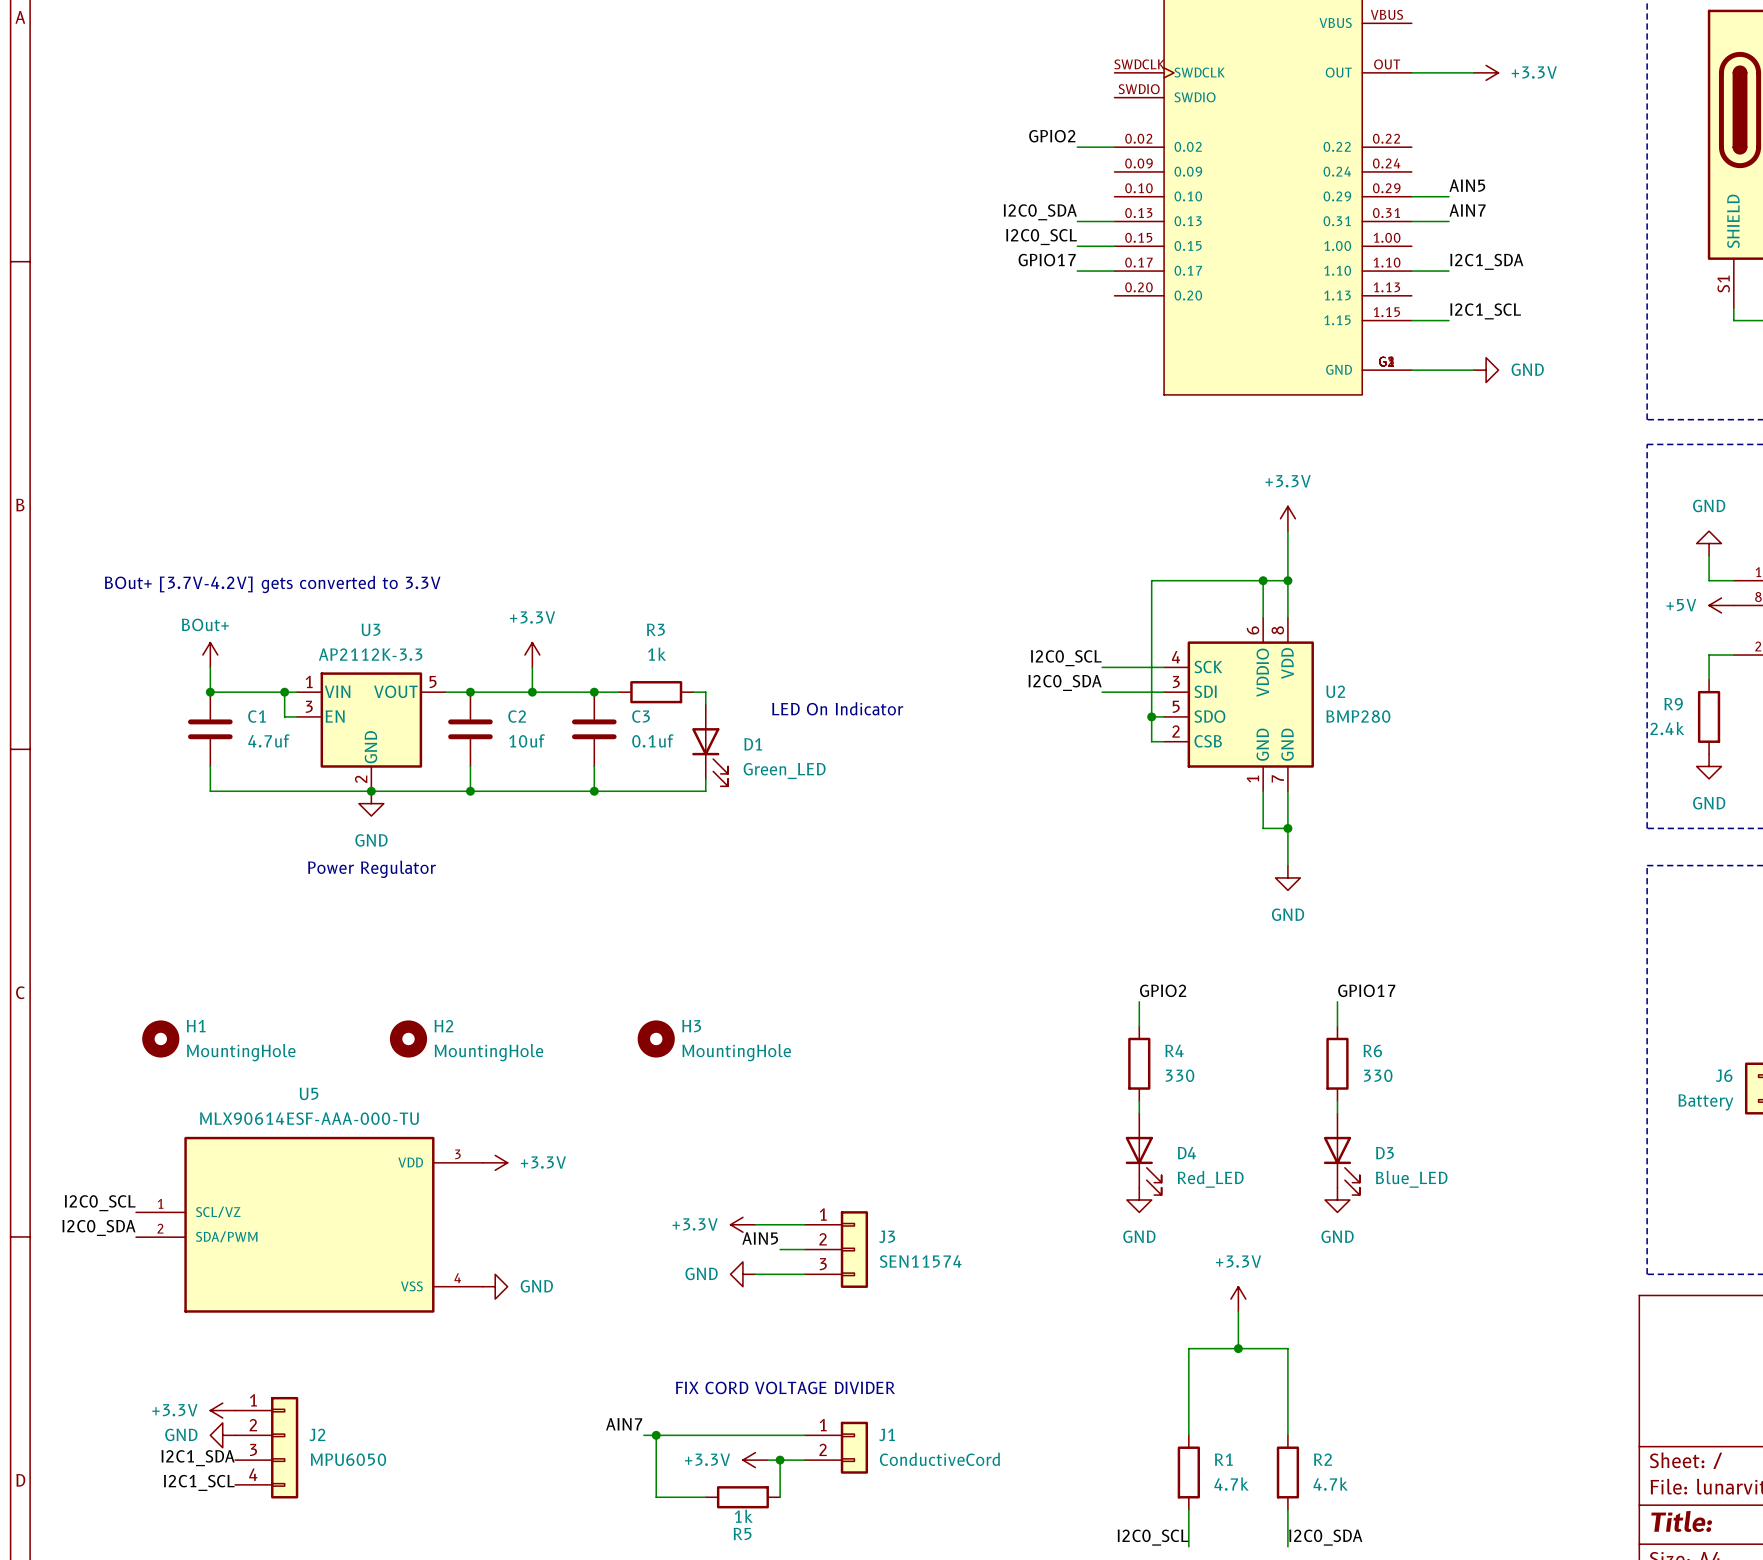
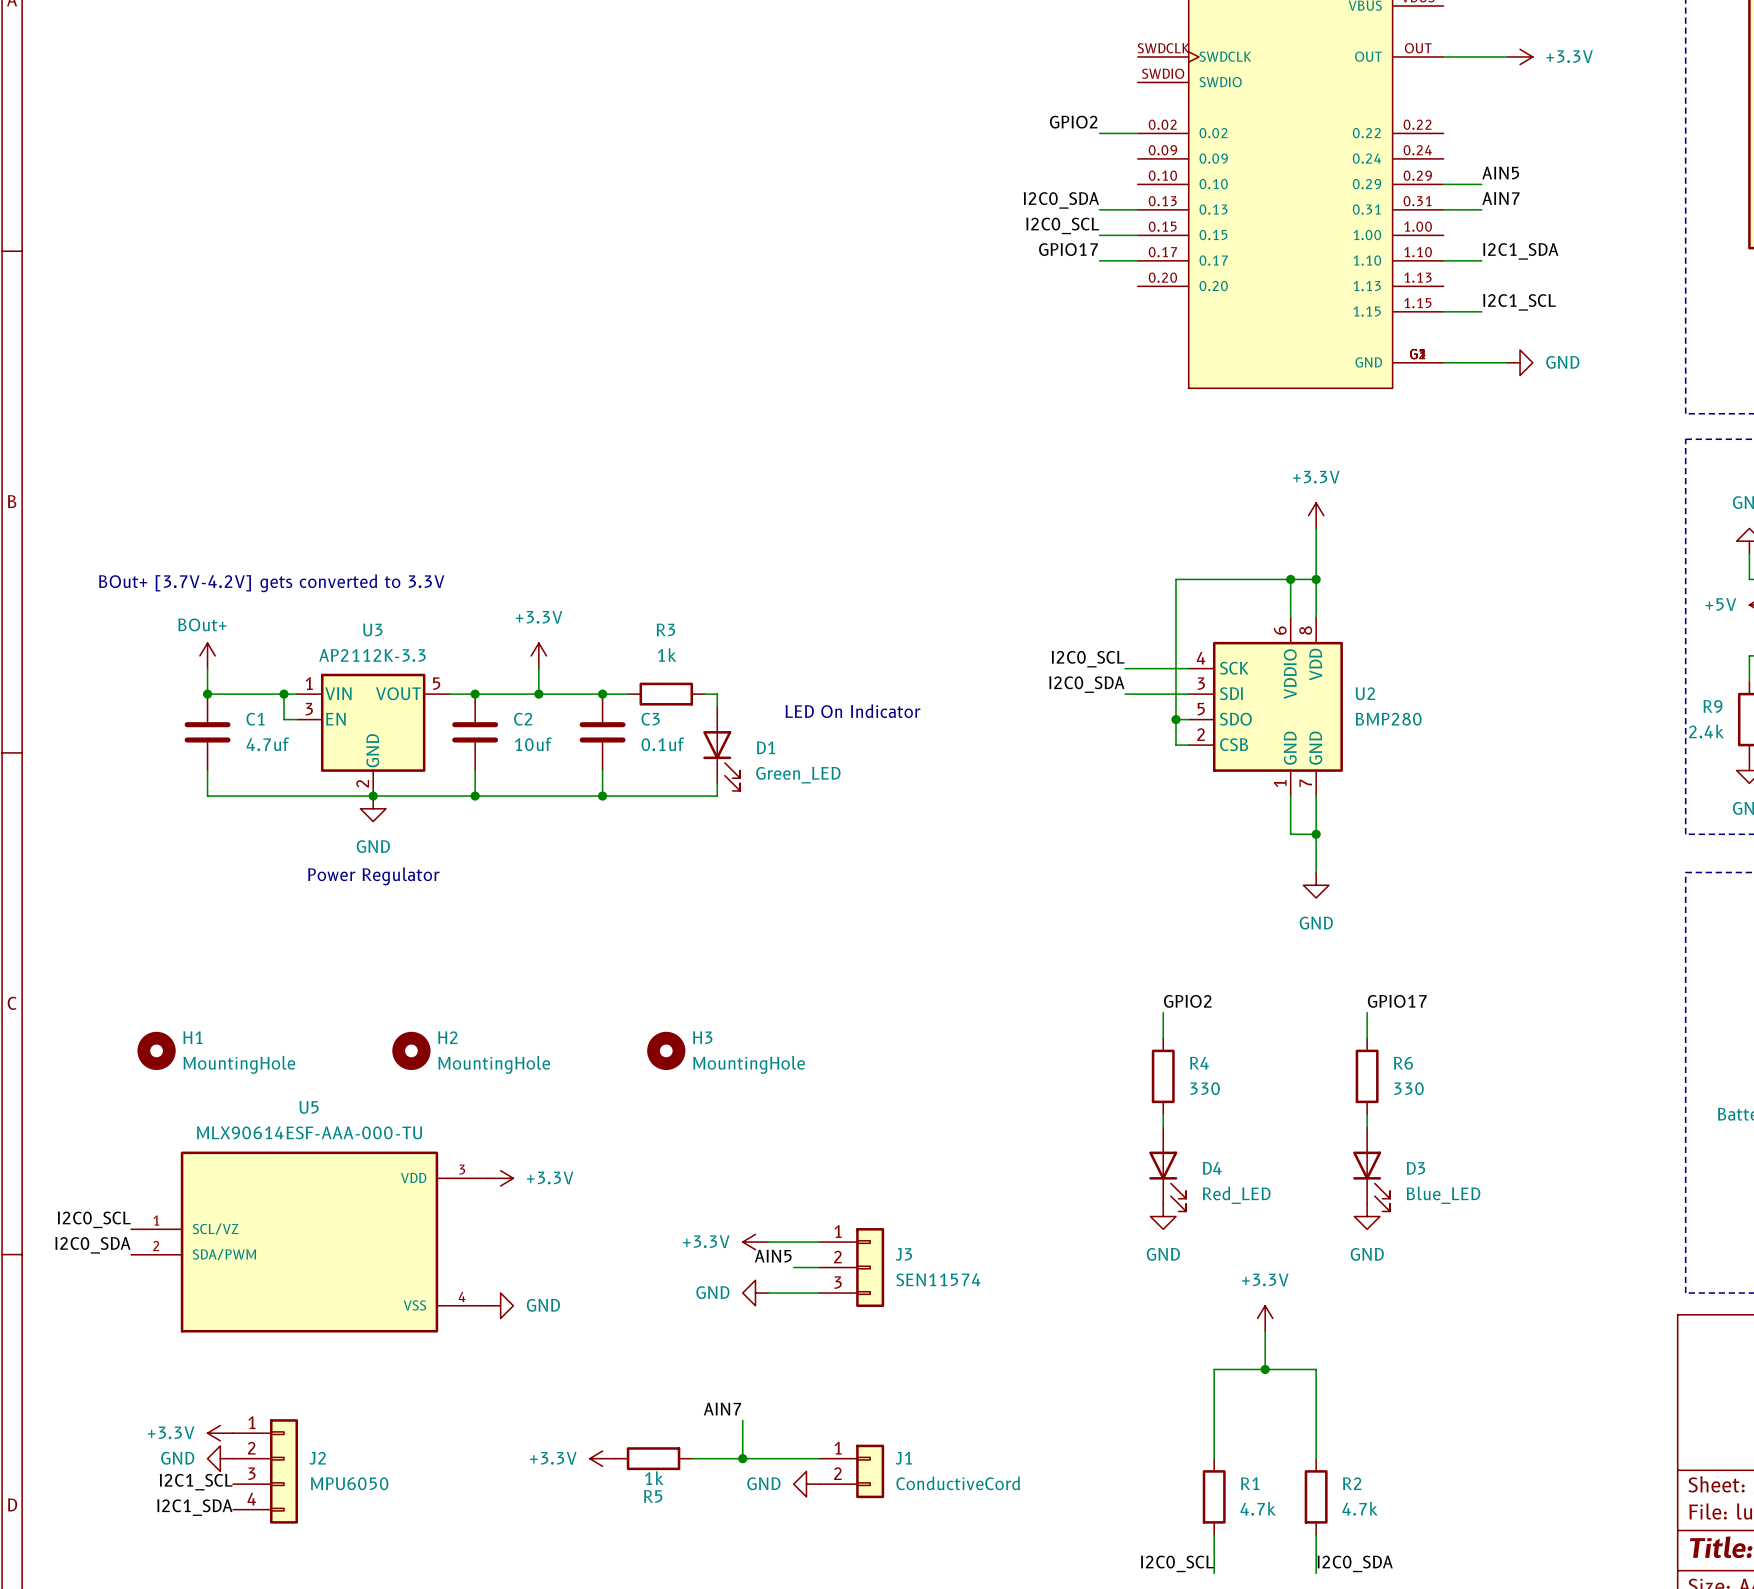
text: FIX CORD VOLTAGE DIVIDER (785, 1387) -> none
label position: AIN7 (624, 1424) -> AIN7 (722, 1409)
wire: (643, 1435) (681, 1435) -> none
wire: (656, 1435) (656, 1497) (705, 1497) -> none
junction: (656, 1435) -> none
junction: none -> (742, 1458)
label: I2C1_SDA (198, 1458) -> I2C1_SCL (196, 1482)
power symbol position: +3.3V (755, 1460) -> +3.3V (602, 1458)
wire: (767, 1460) (804, 1460) -> none
wire: (780, 1460) (780, 1497) -> (742, 1420) (742, 1458)
junction: (780, 1460) -> none
power symbol: none -> GND (806, 1484)
label: I2C1_SCL (199, 1482) -> I2C1_SDA (194, 1507)
R5 position: (742, 1497) -> (653, 1458)

